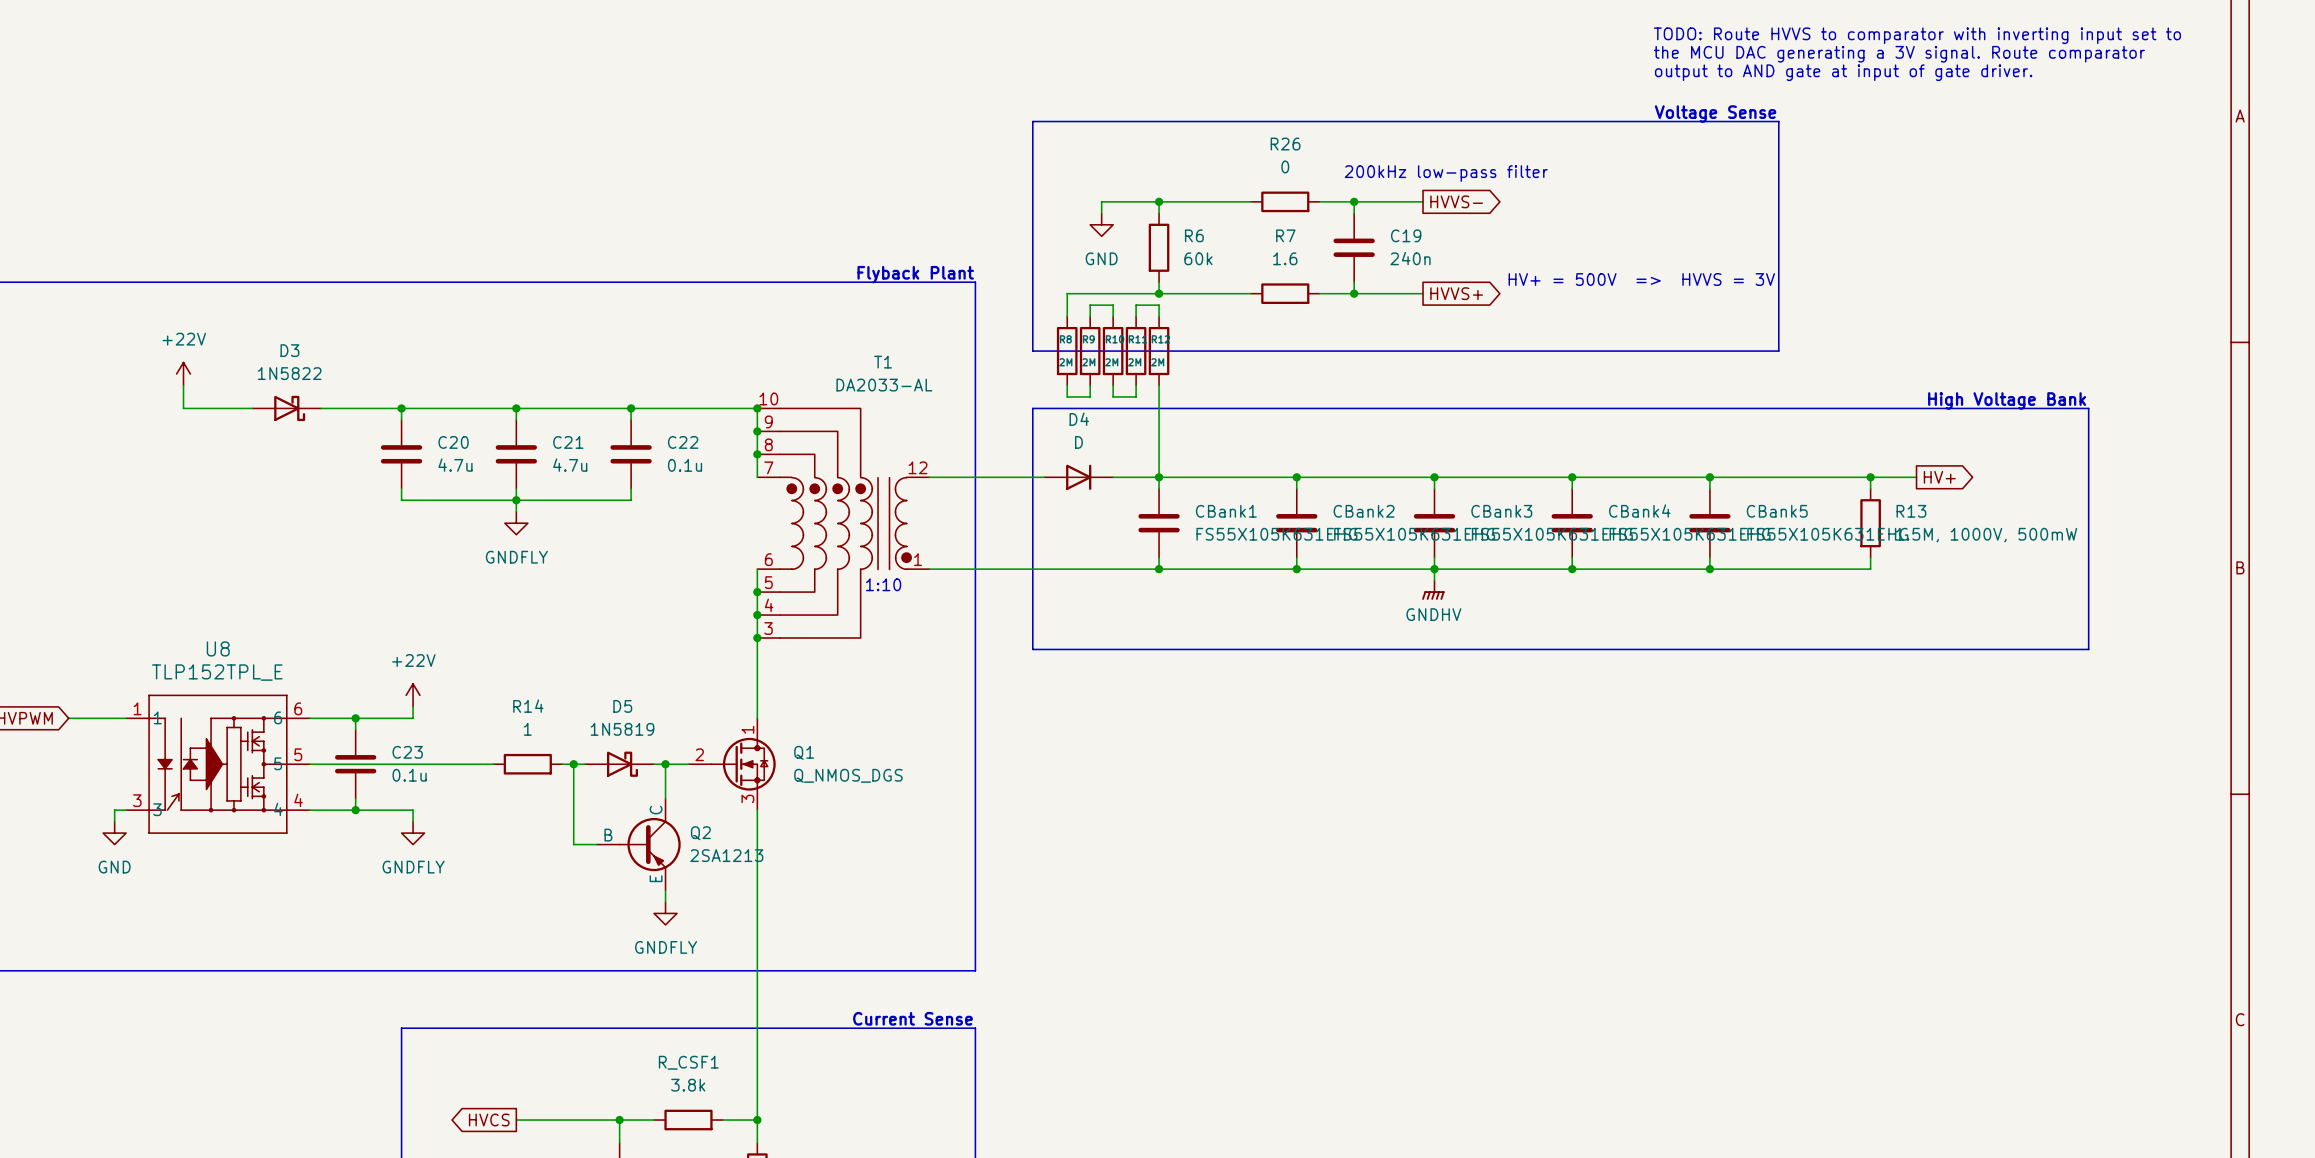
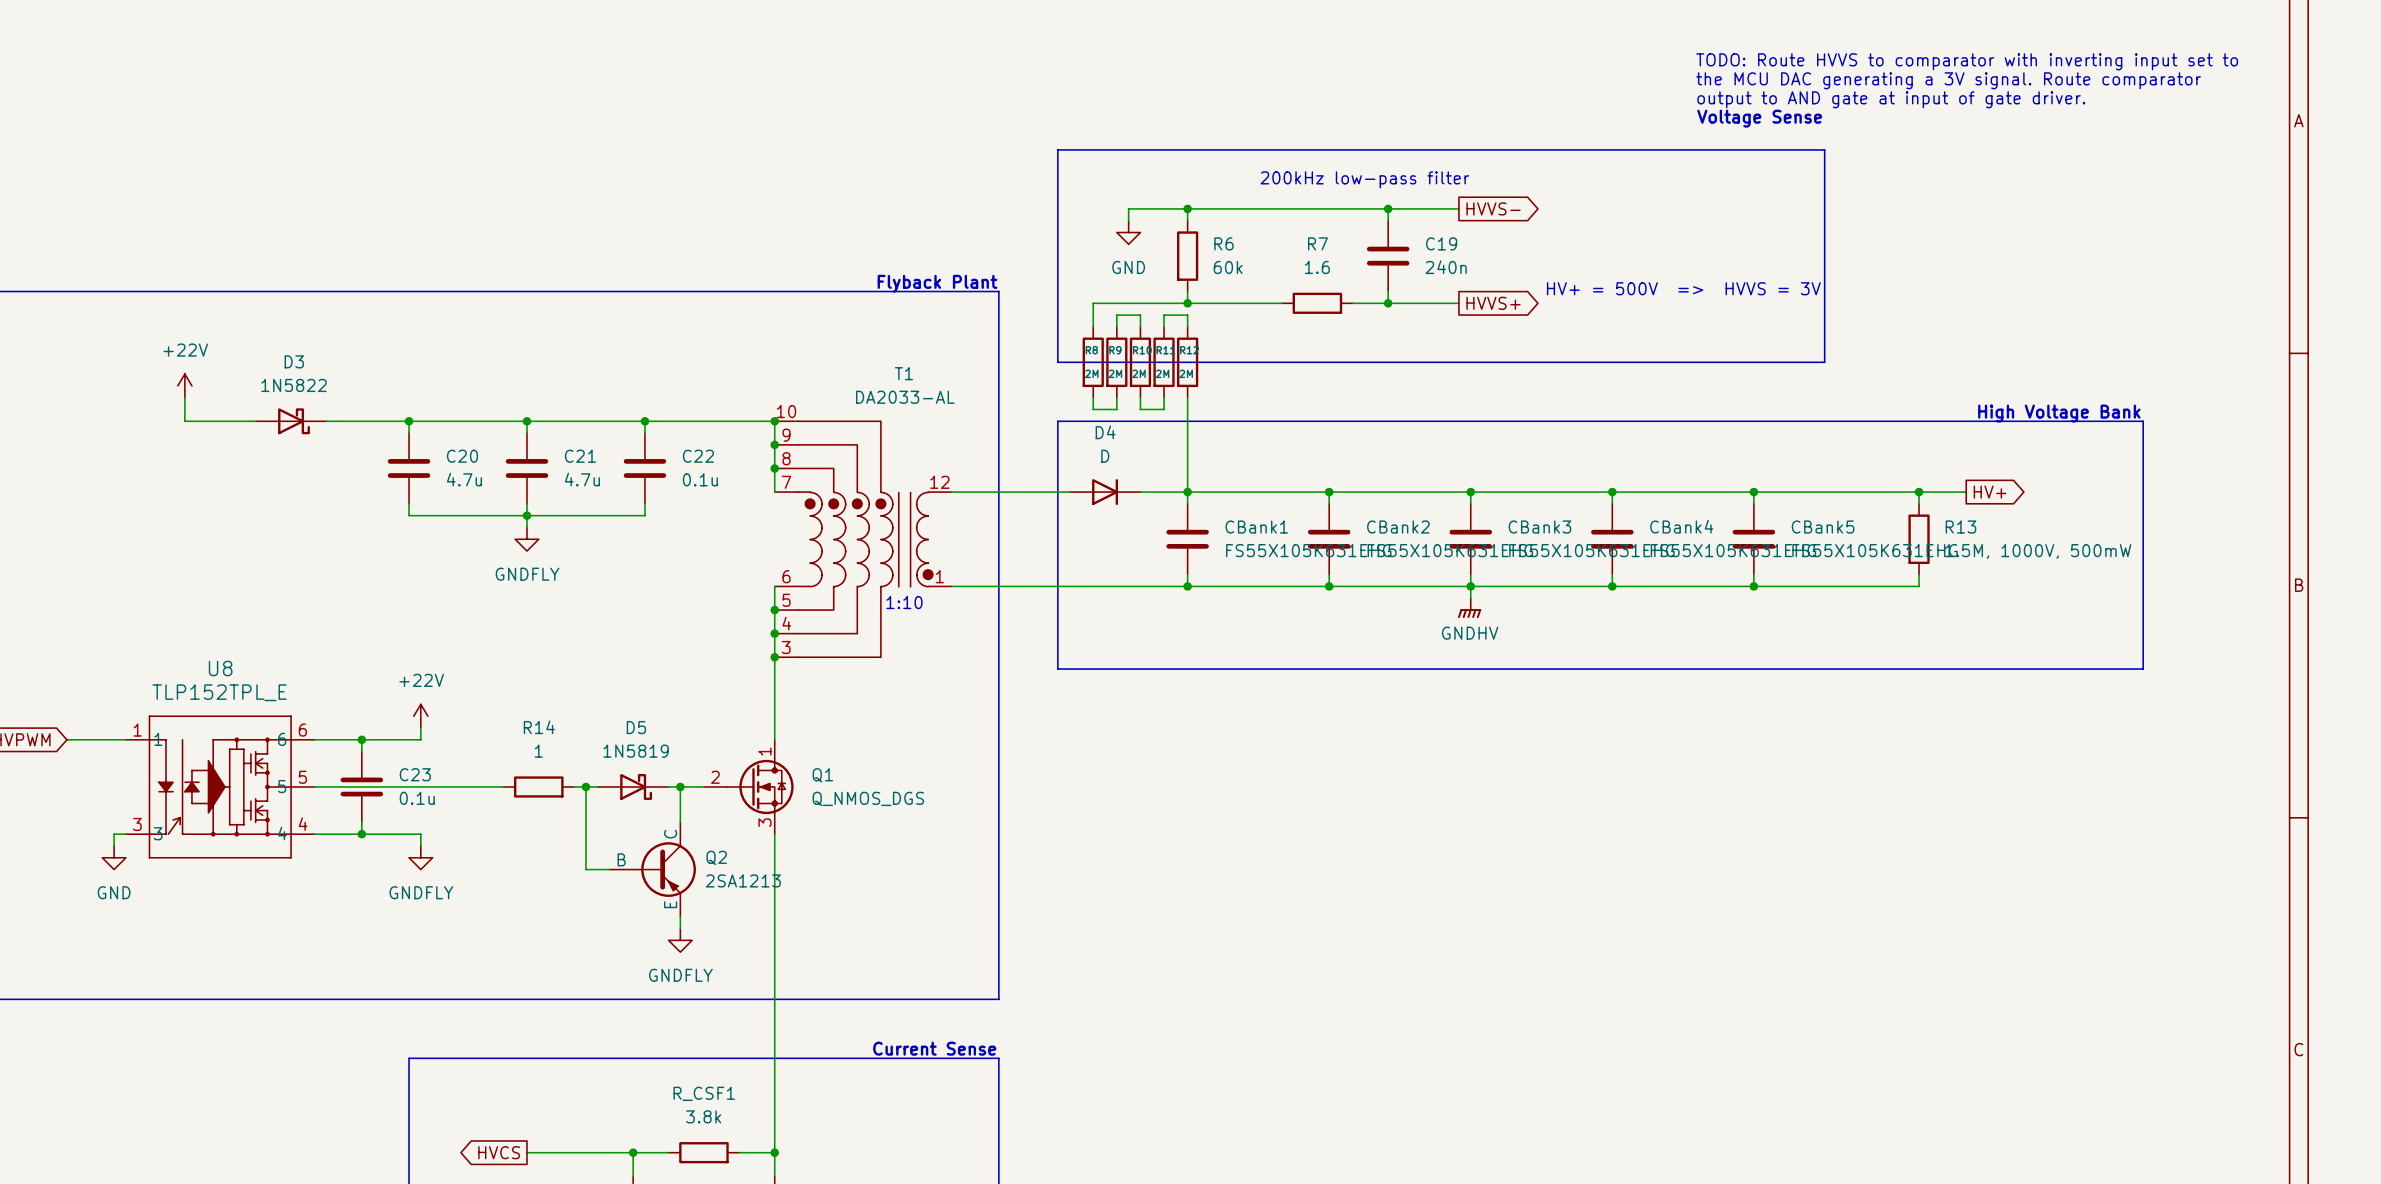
text position: TODO: Route HVVS to comparator with inverting input set to (1917, 35) -> TODO: Route HVVS to comparator with inverting input set to (1967, 61)
text position: the MCU DAC generating a 3V signal. Route comparator (1899, 54) -> the MCU DAC generating a 3V signal. Route comparator (1948, 80)
text position: output to AND gate at input of gate driver. (1843, 72) -> output to AND gate at input of gate driver. (1891, 99)
line: (1032, 144) (1032, 121) (1778, 121) (1778, 144) -> (1057, 149) (1824, 149)
text position: 200kHz low-pass filter (1446, 173) -> 200kHz low-pass filter (1364, 179)
wire: none -> (1282, 208) (1352, 208)
R26: 0 (1285, 201) -> none

